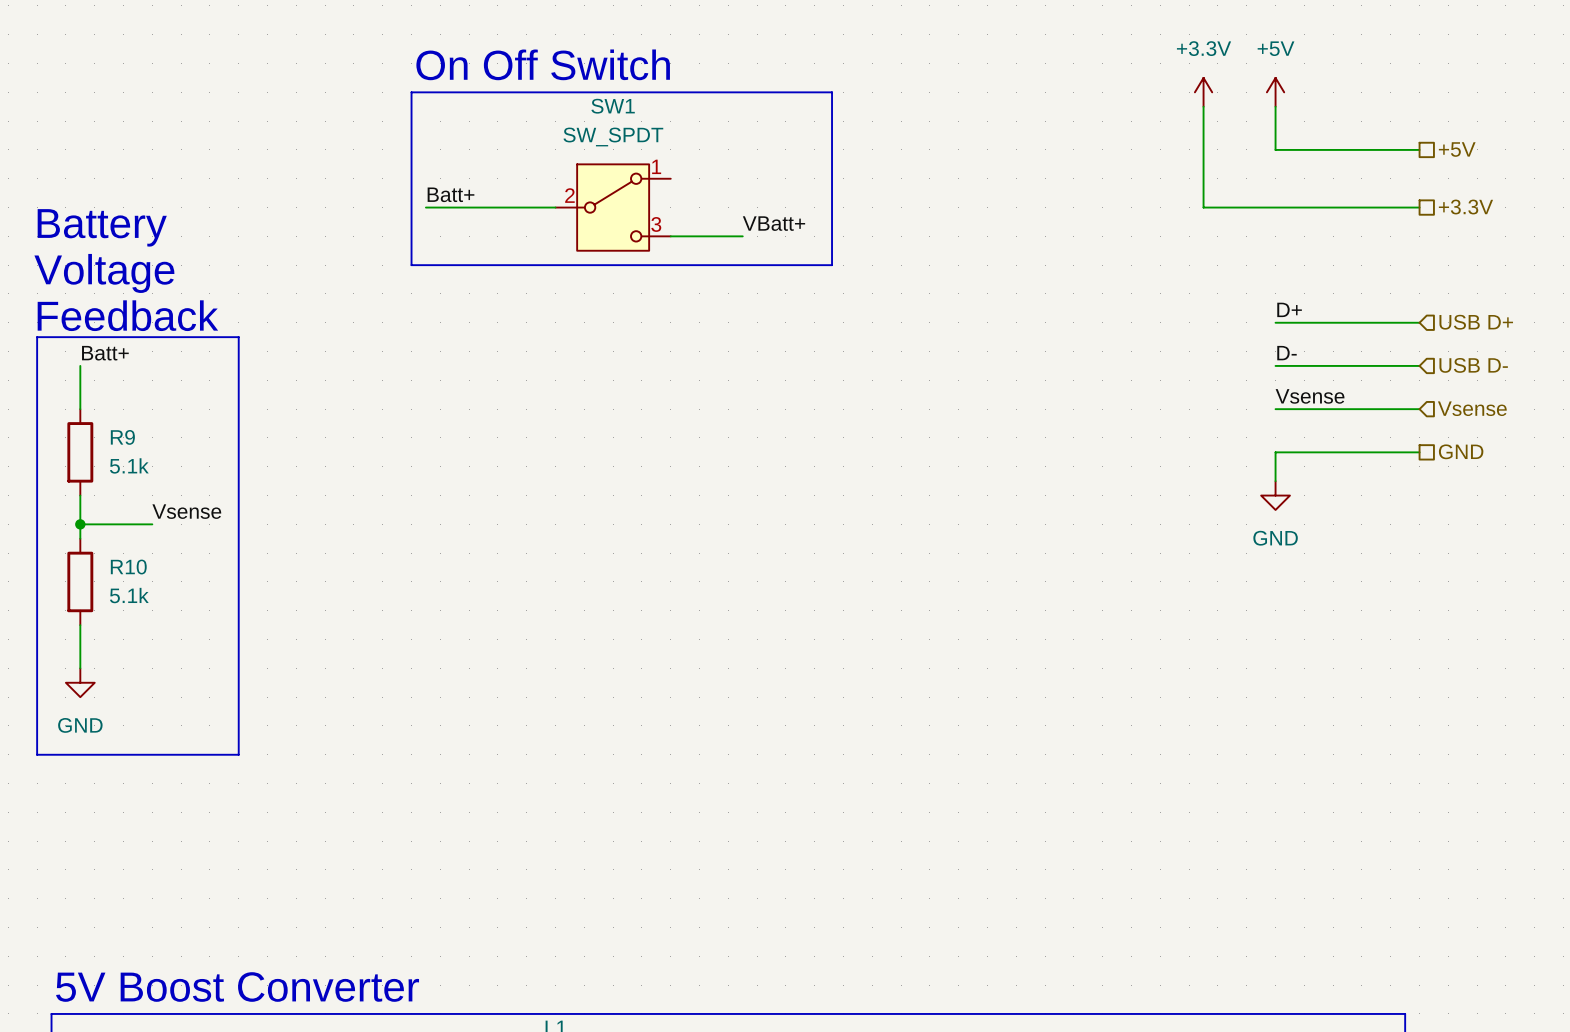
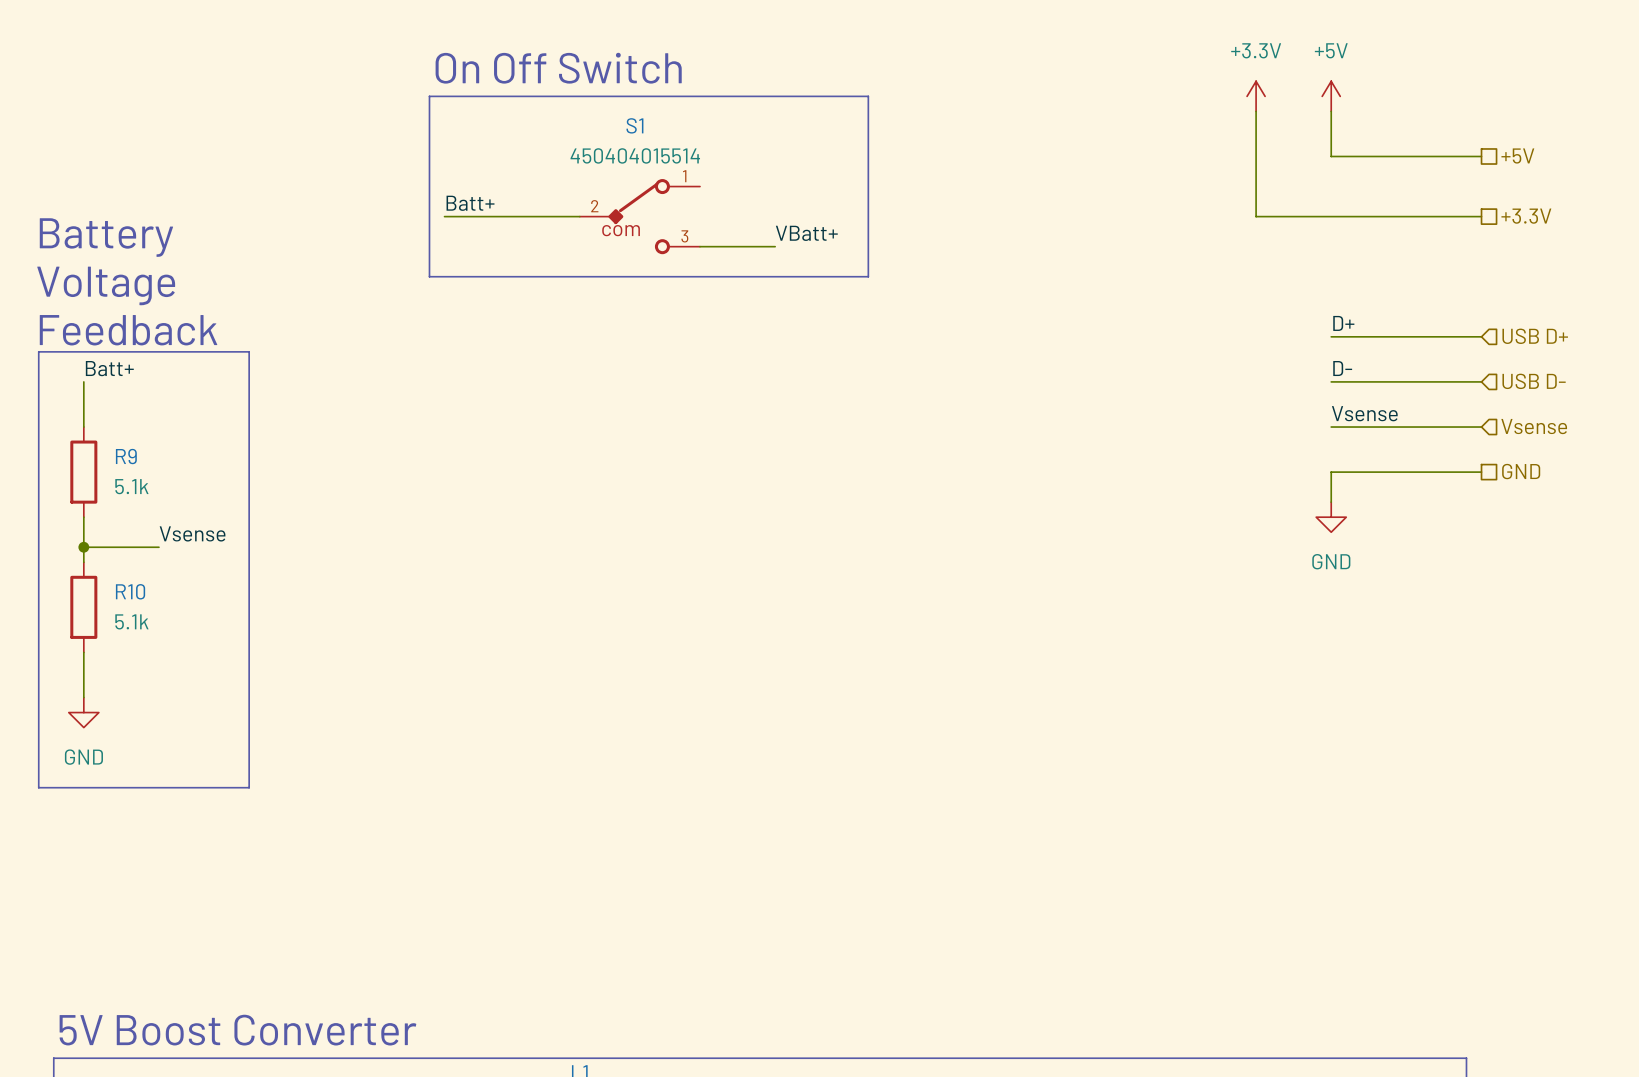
SW1: SW_SPDT (613, 207) -> none
S1: none -> 450404015514 (639, 216)

